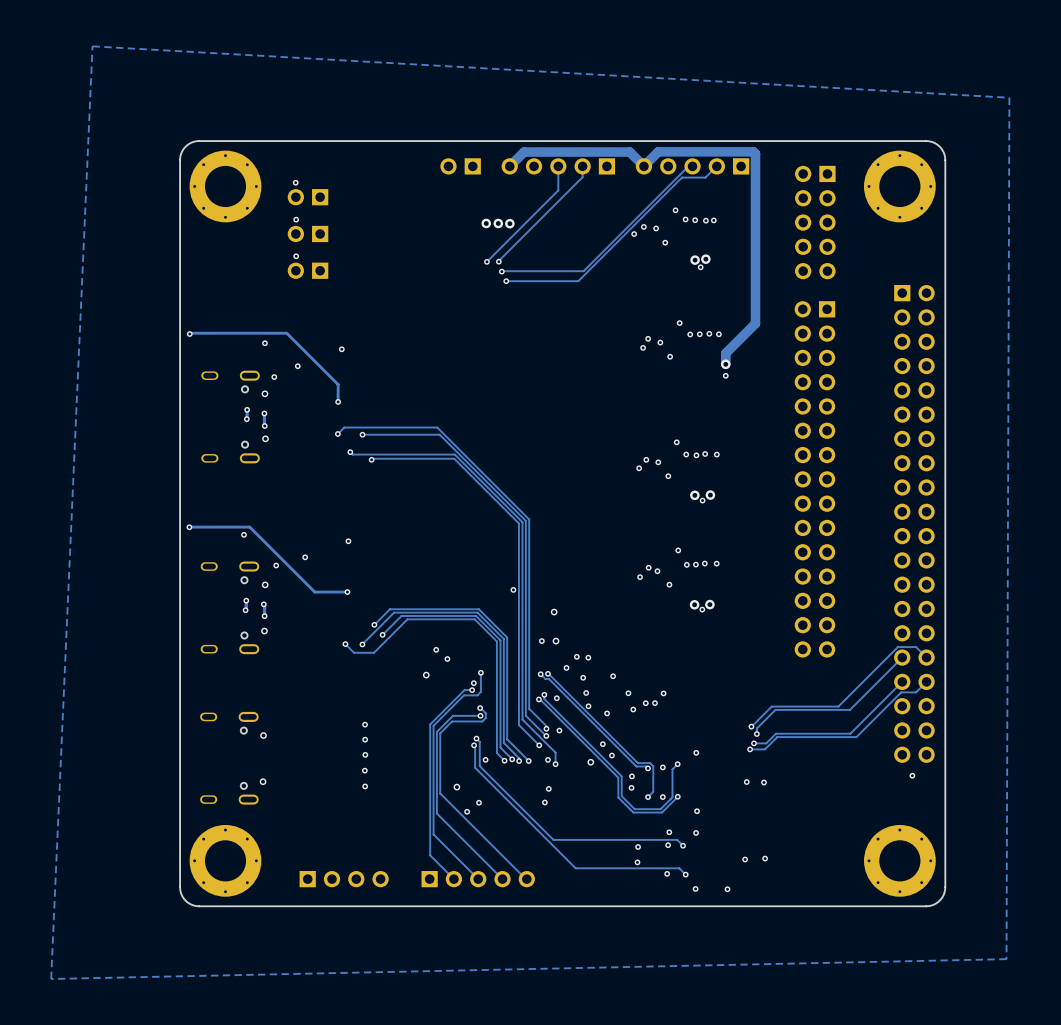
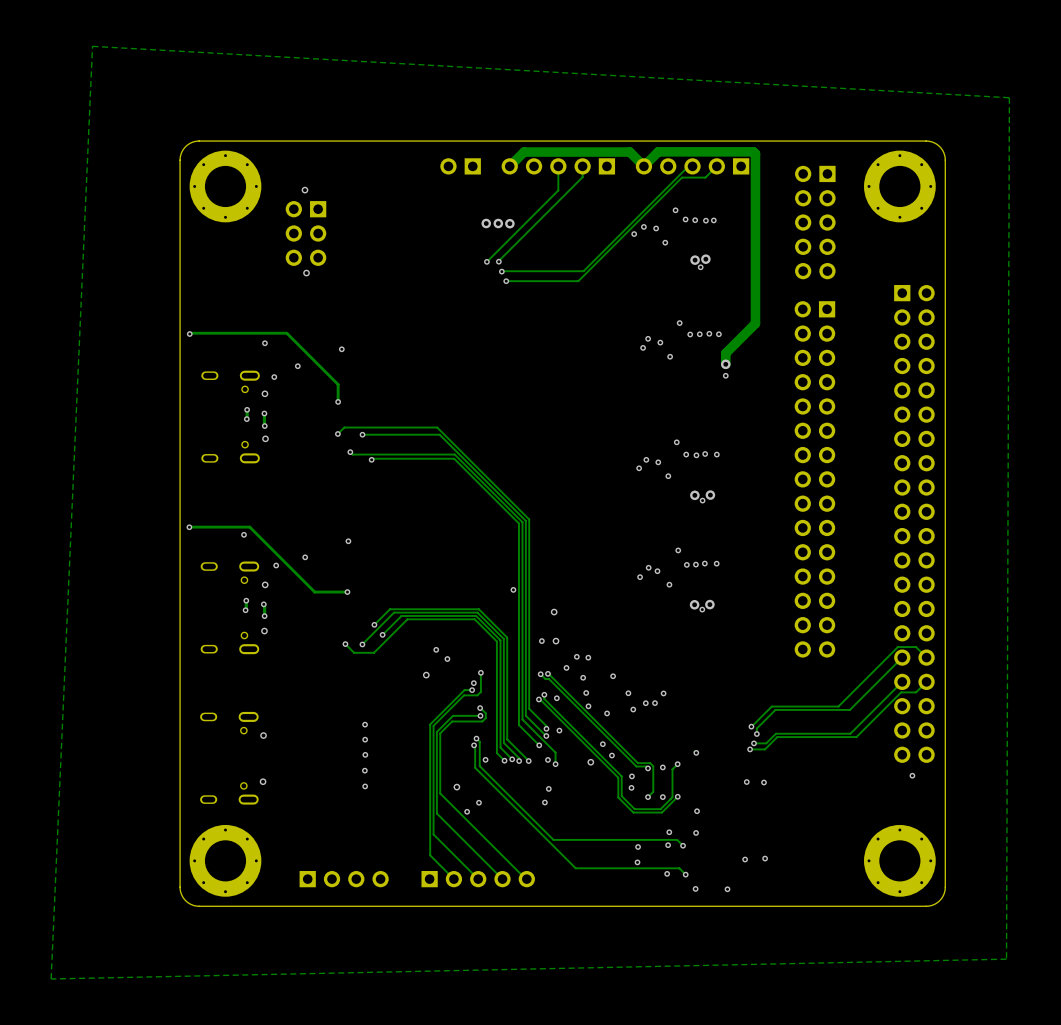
via: (295, 182) -> none
via: none -> (304, 190)
part: (308, 197) -> none
via: (296, 219) -> none
part footprint: [287, 225, 329, 243] -> [285, 201, 327, 266]
via: (296, 256) -> none
part: (308, 270) -> none
via: none -> (306, 273)

